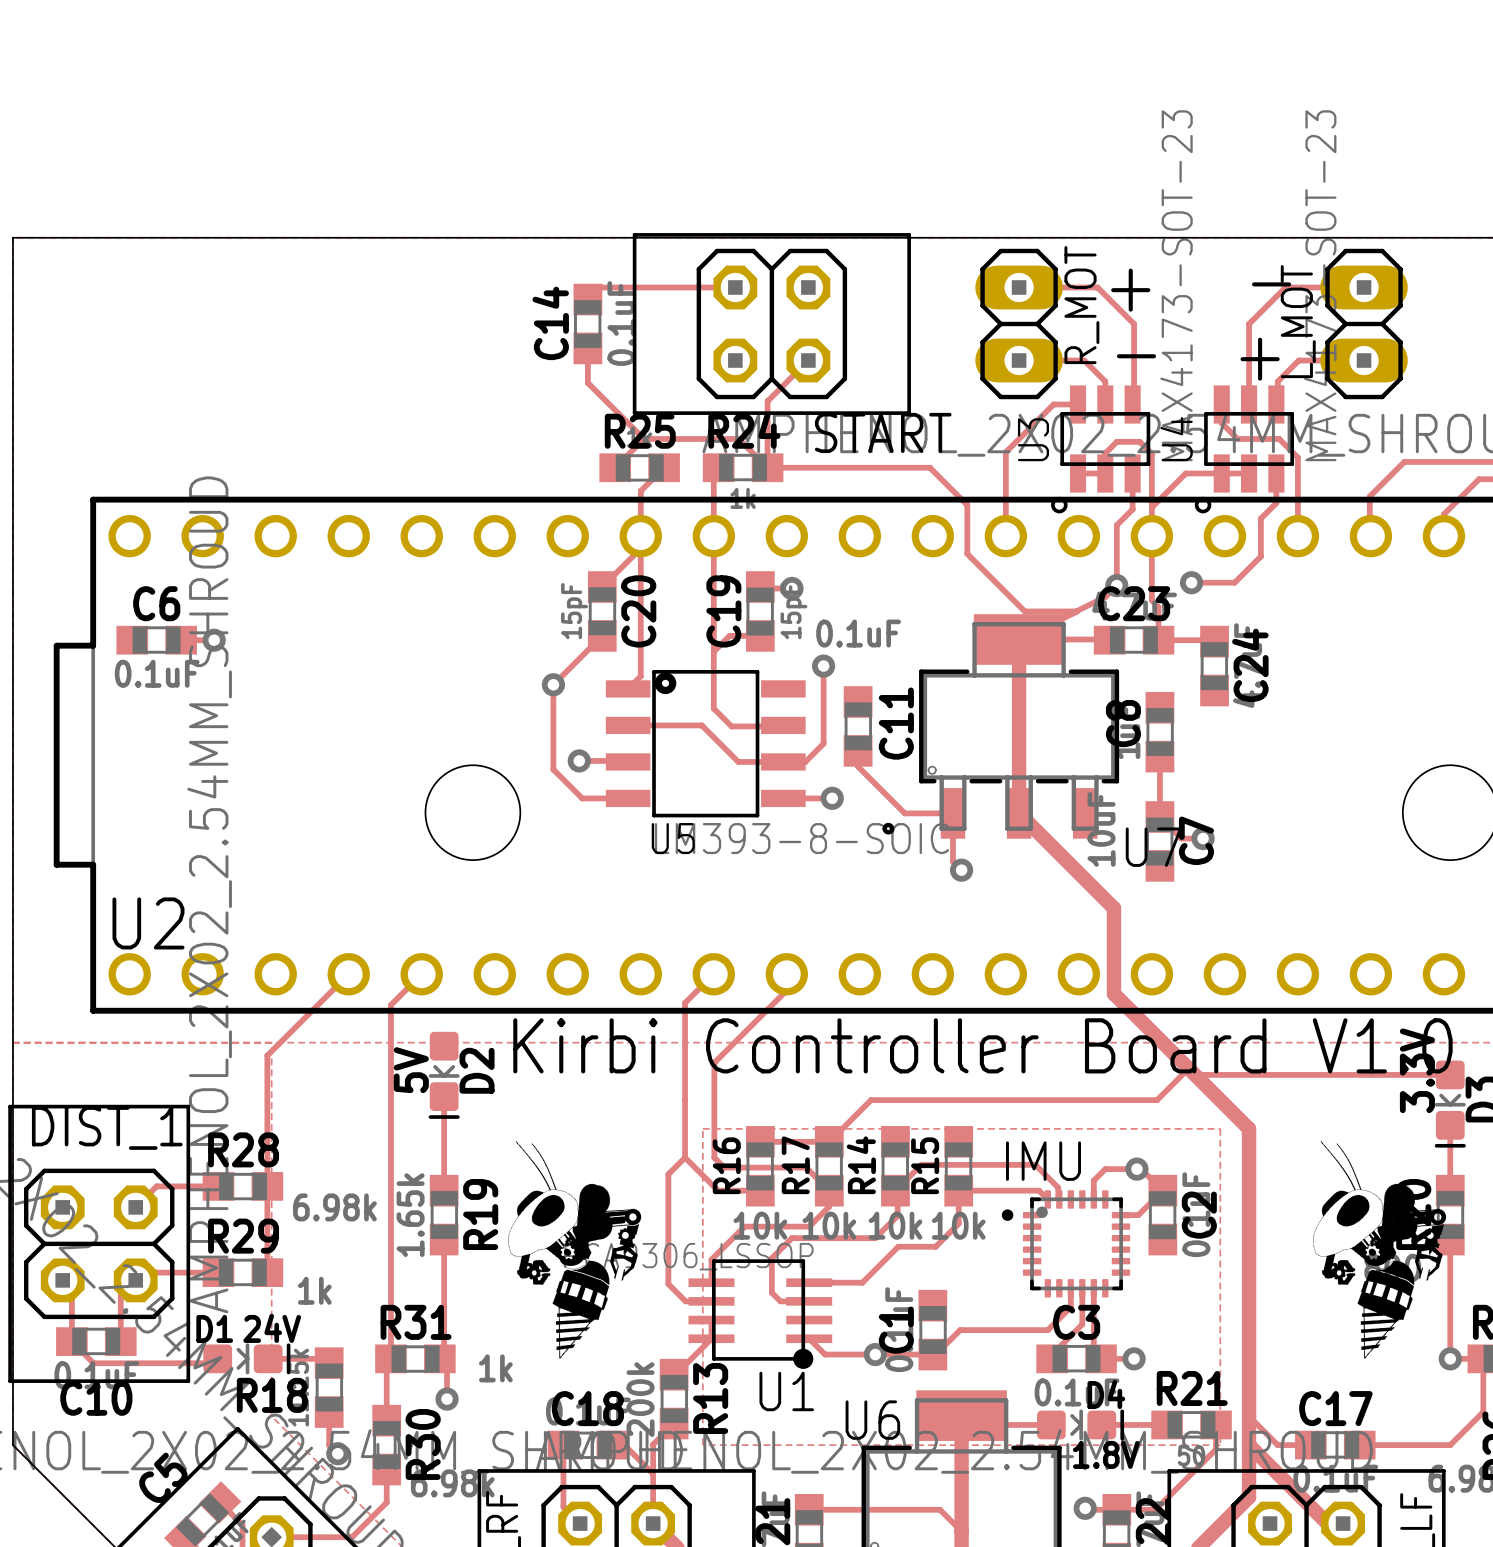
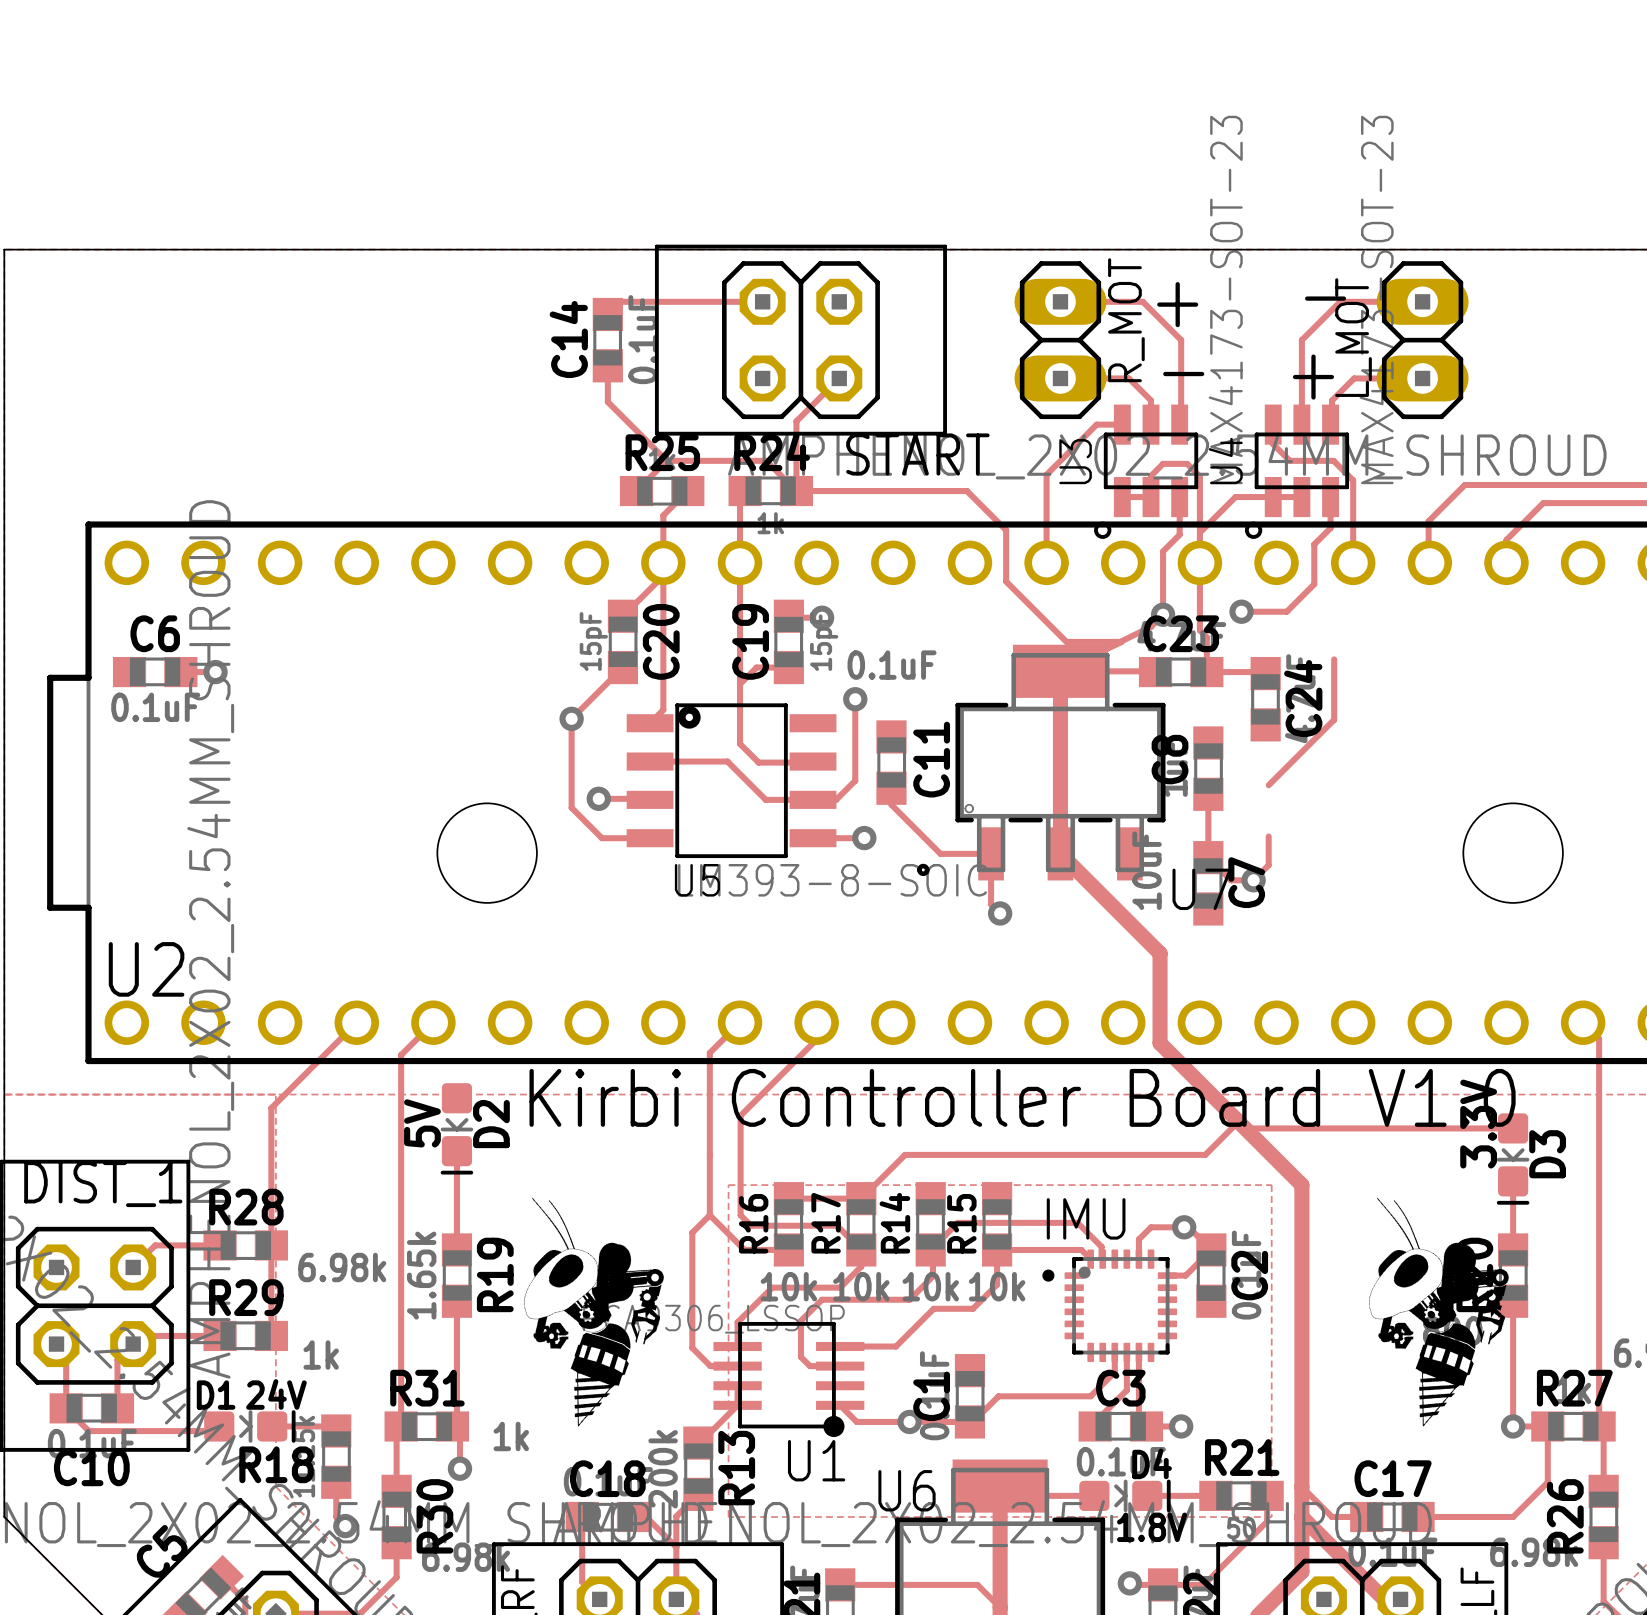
track: none -> (1334, 659) (1334, 719) (1268, 785)
track: none -> (1268, 836) (1268, 865) (1253, 880)

